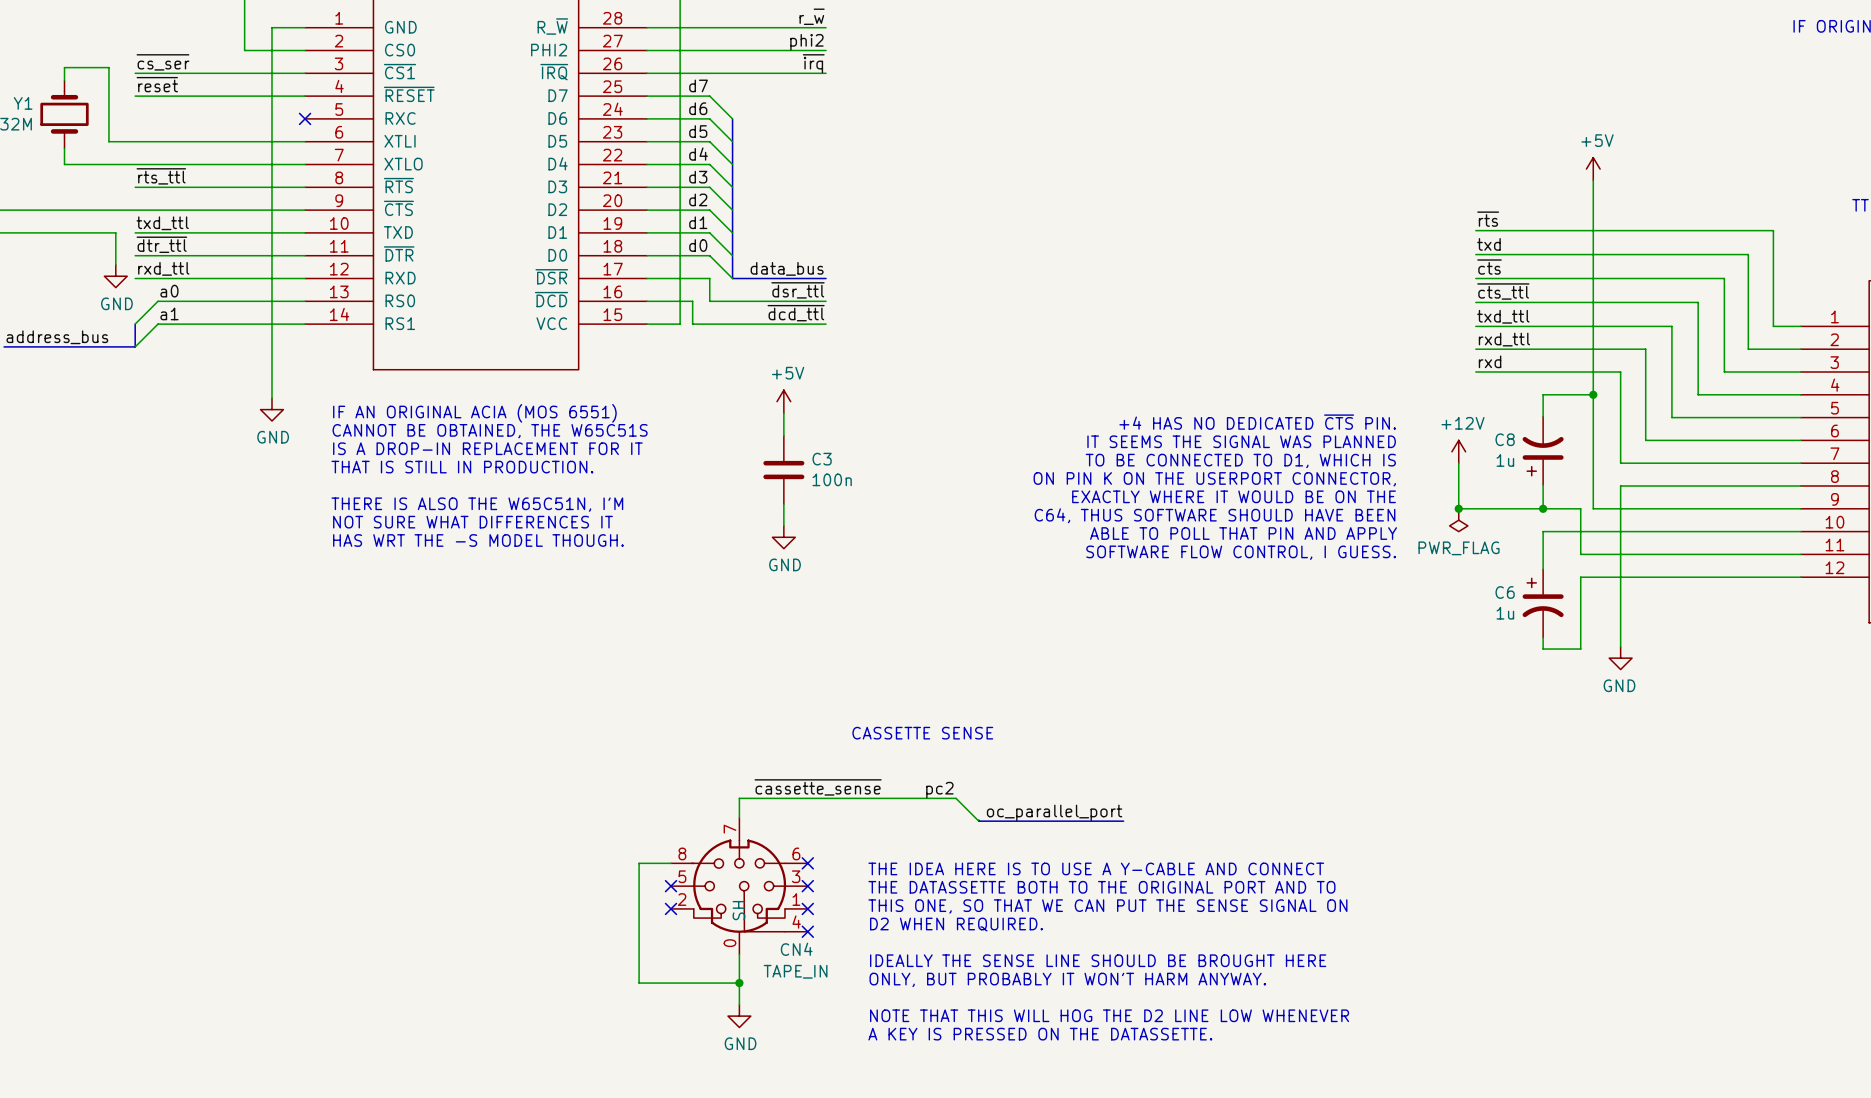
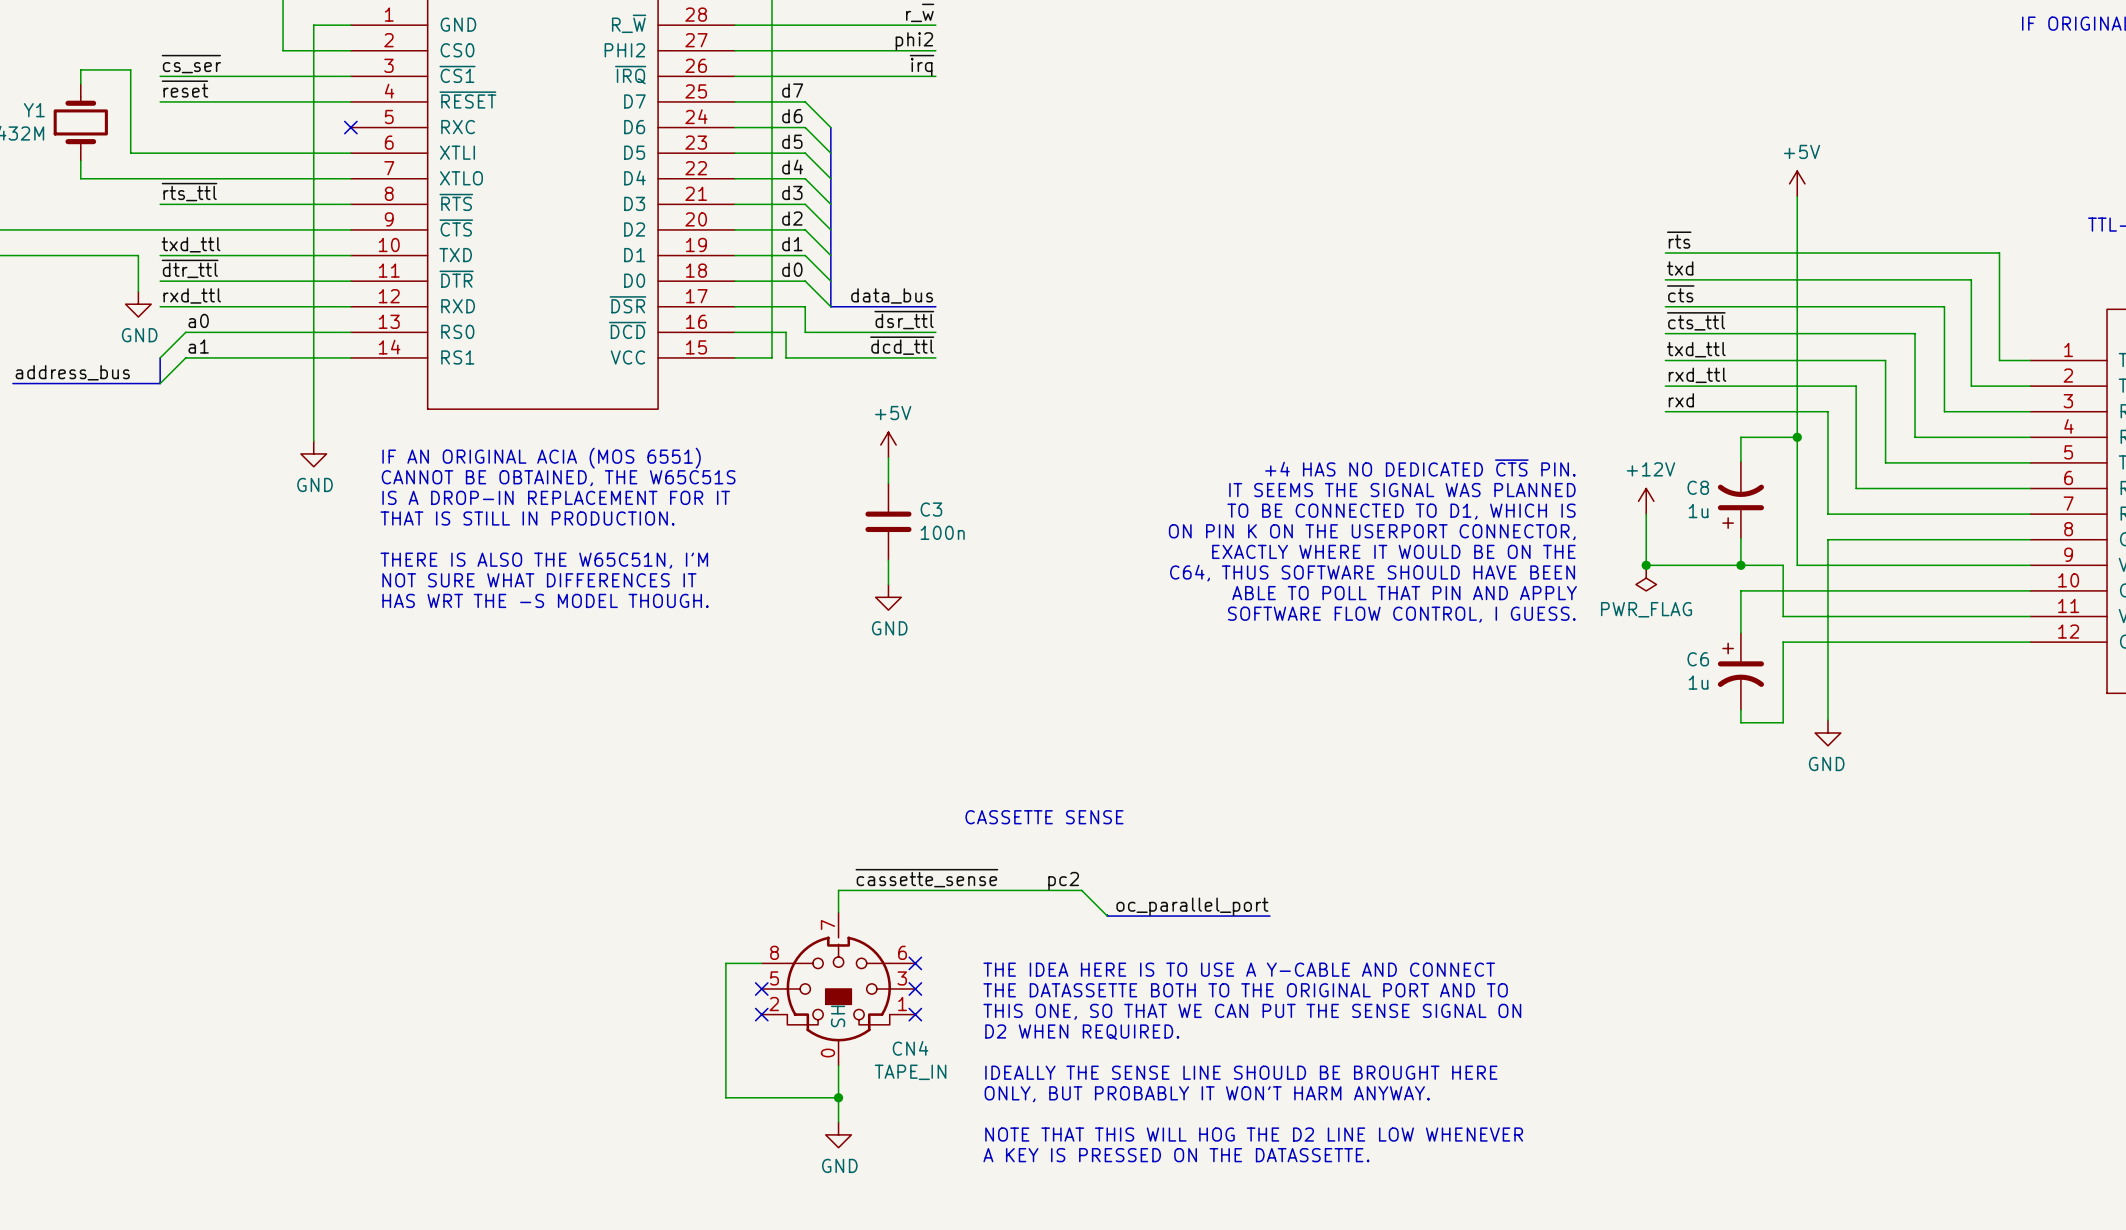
CN4 symbol: [671, 817, 808, 955] -> [761, 912, 916, 1066]
no-connect mark: (807, 931) -> none

